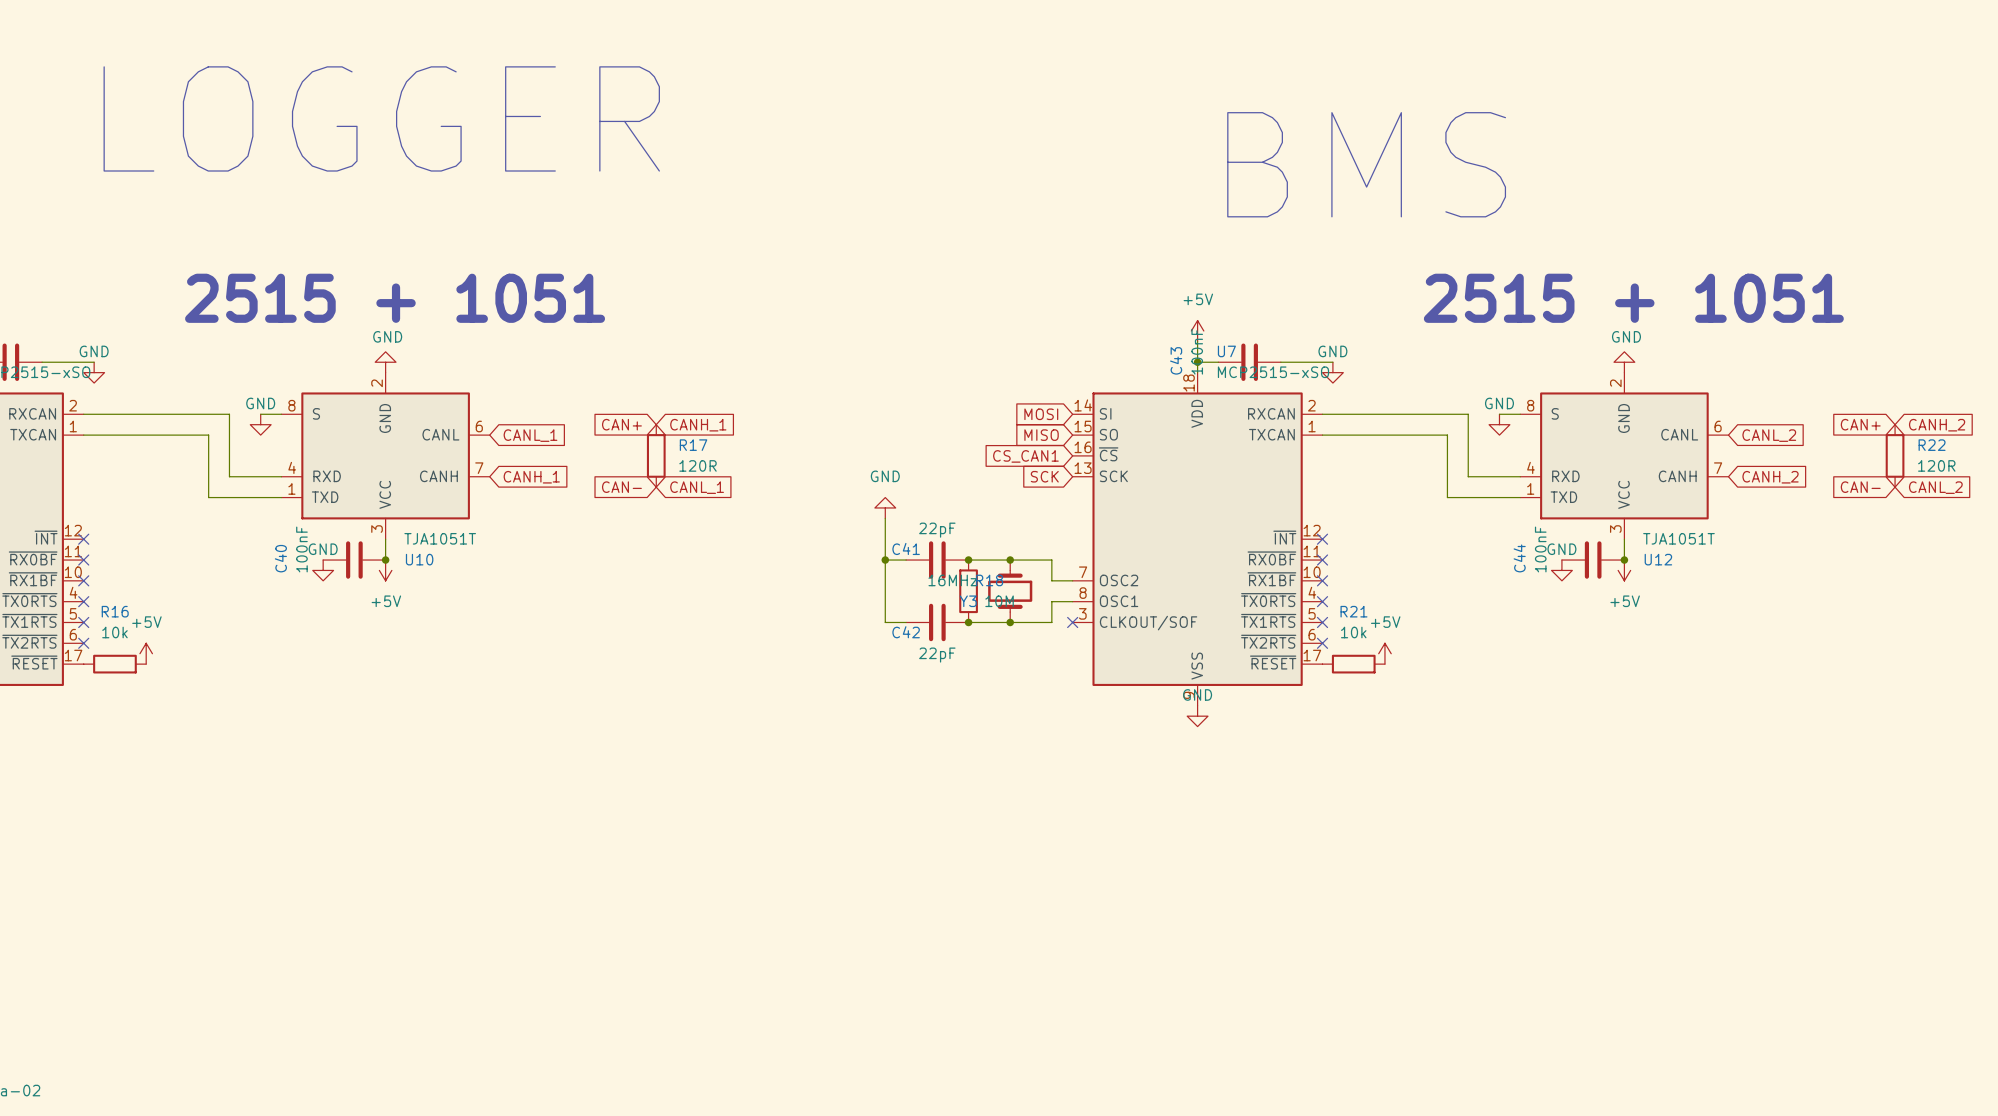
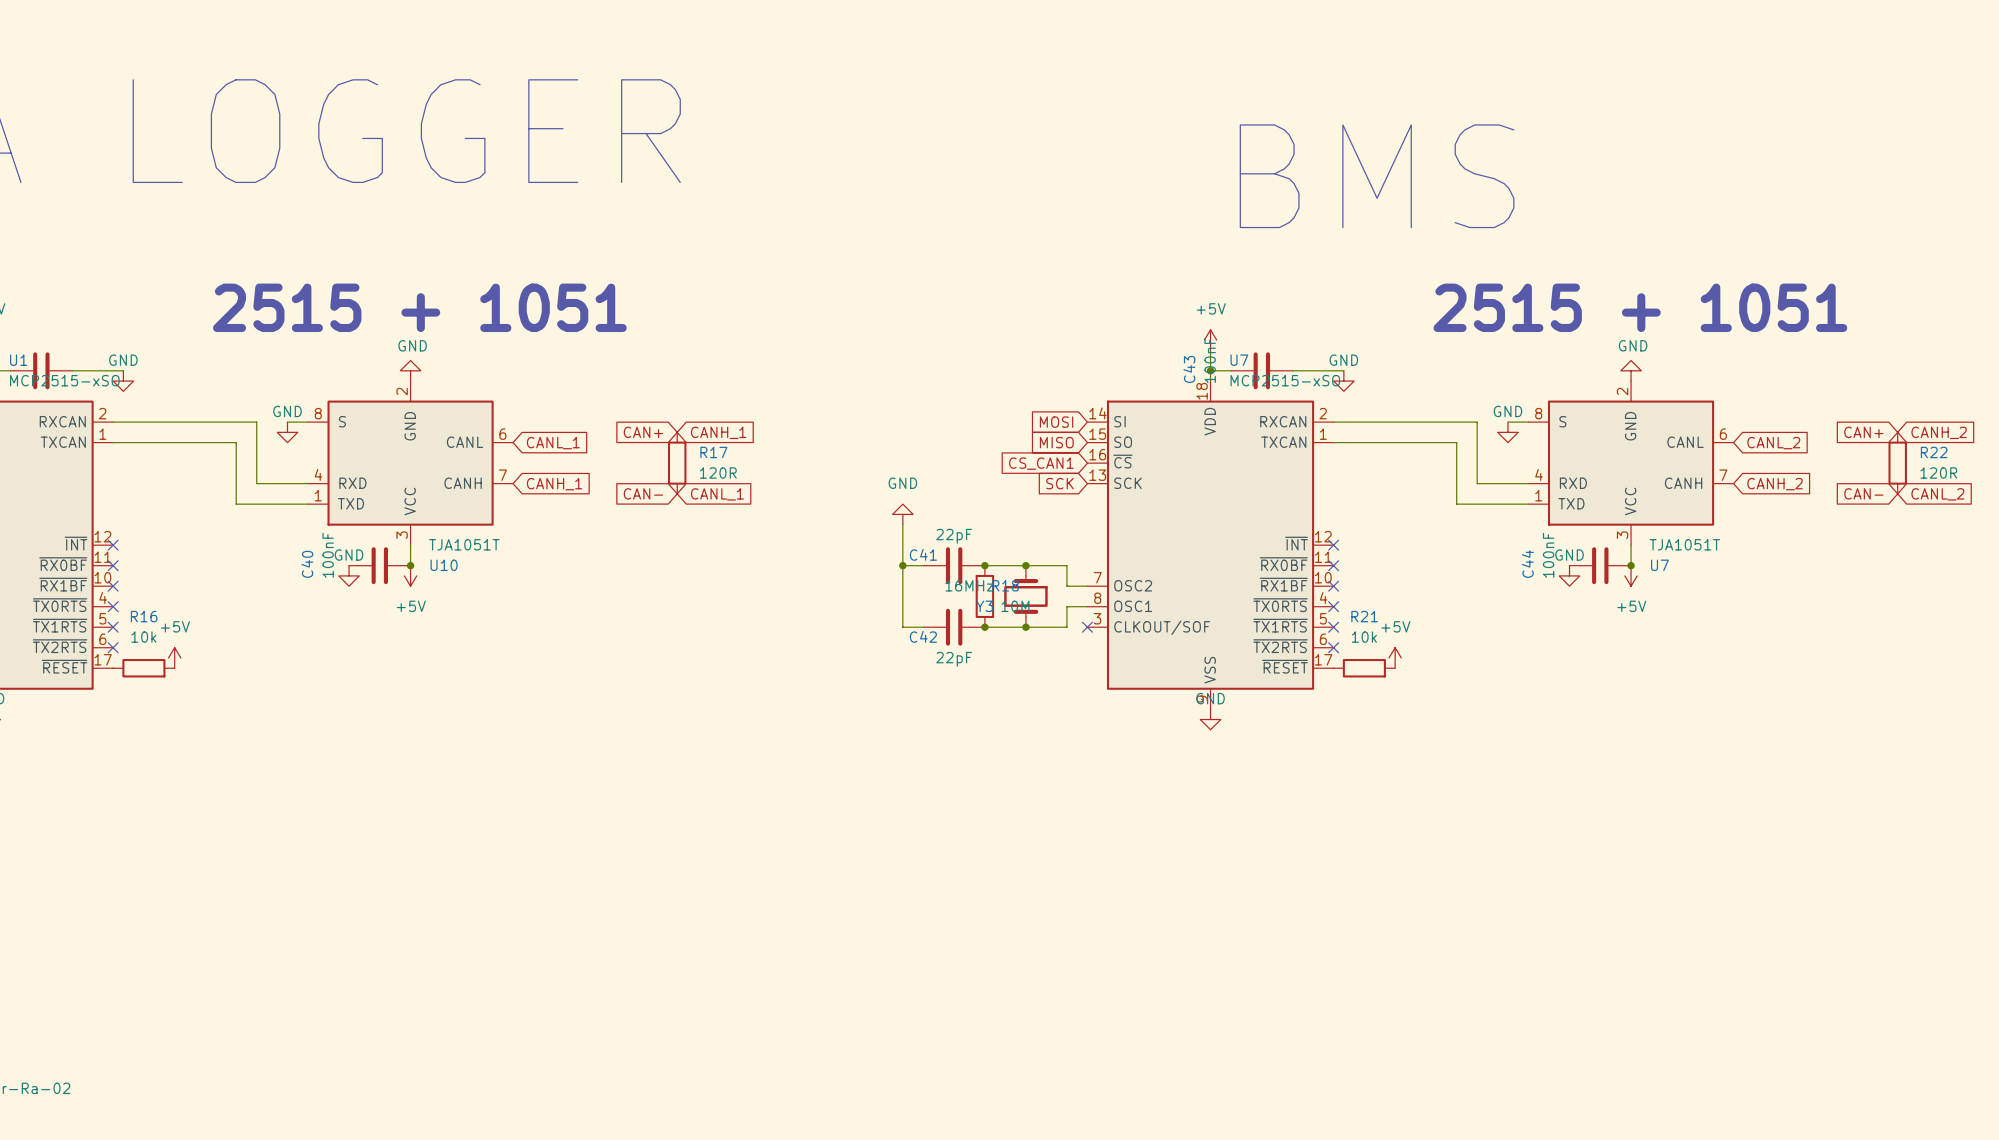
U12 name: U12 (1658, 559) -> U7 (1659, 565)

